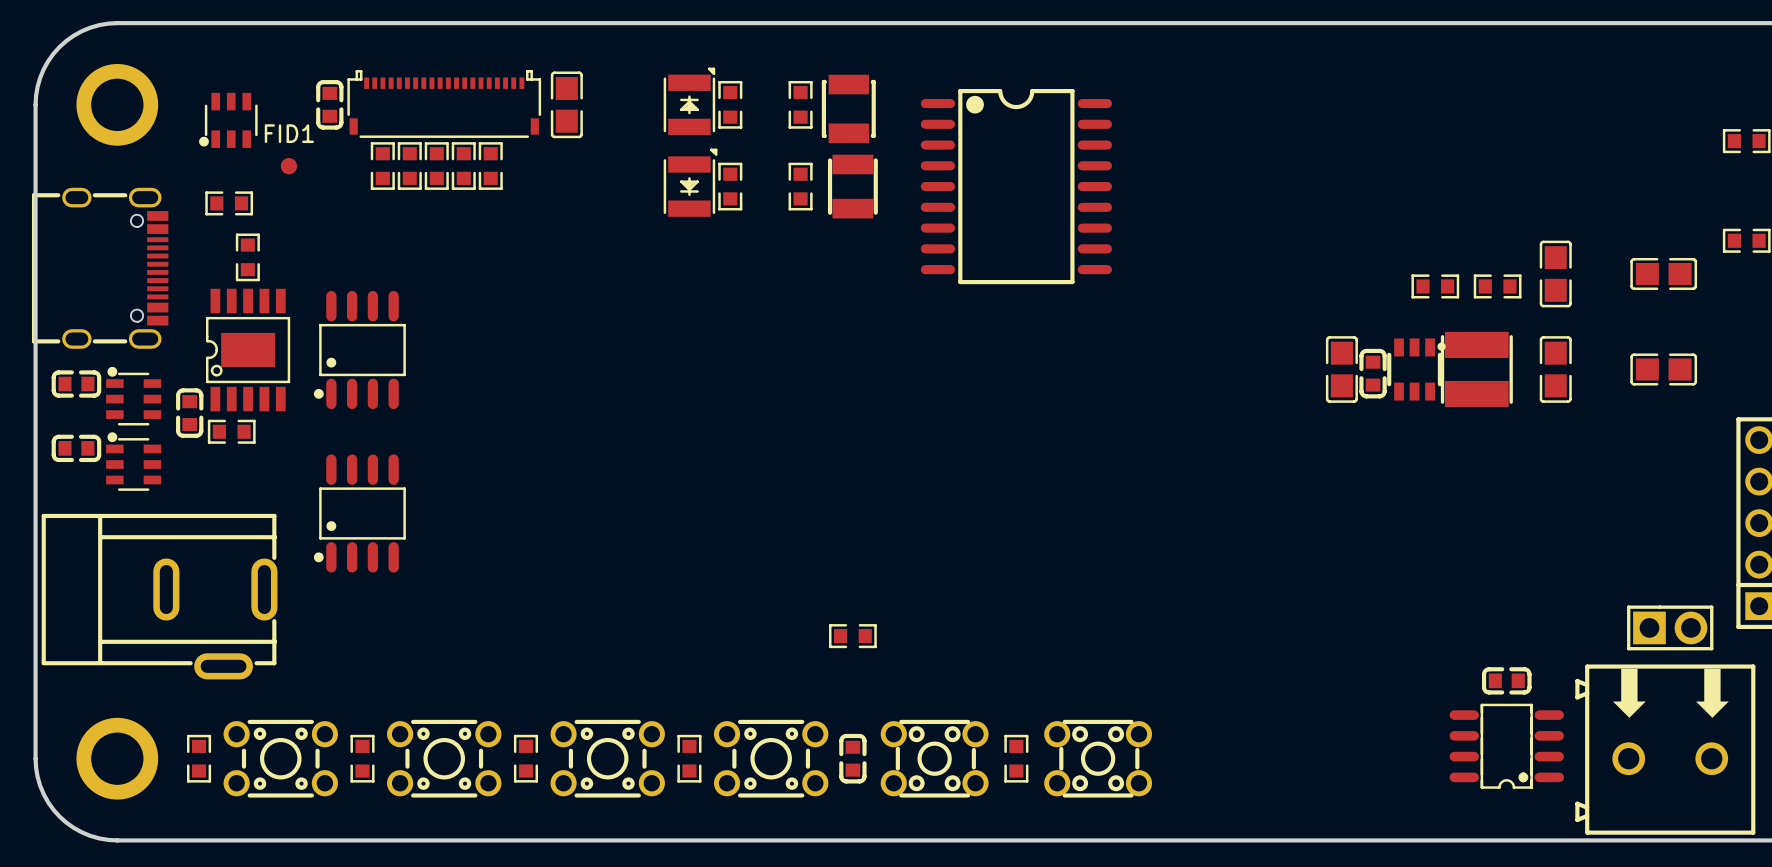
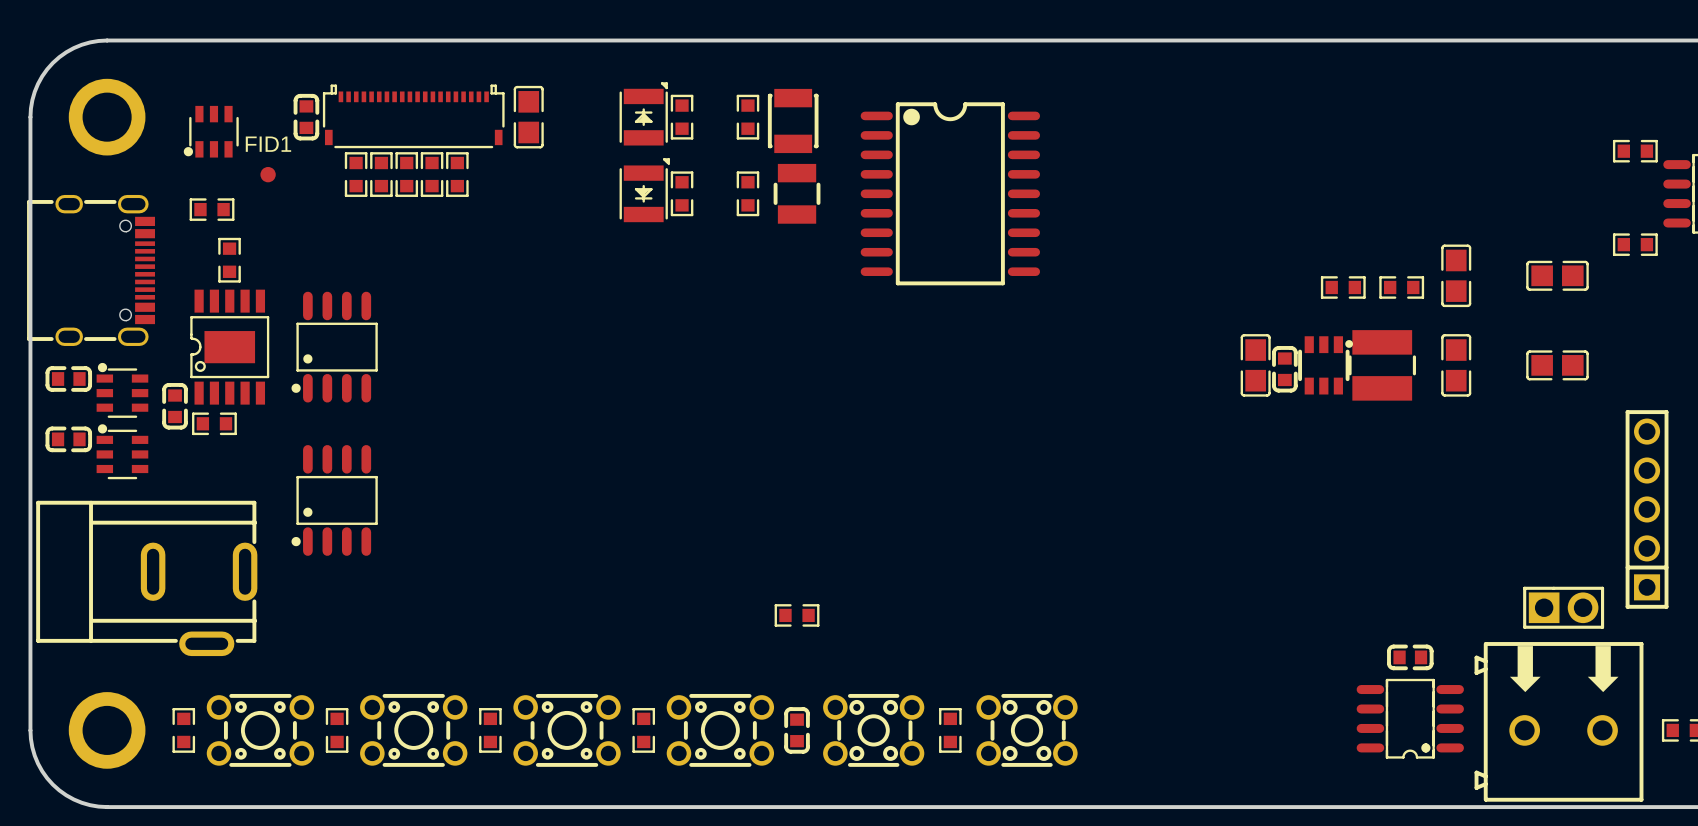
part footprint: [827, 154, 878, 219] -> [773, 163, 821, 224]
part footprint: [1440, 331, 1513, 408] -> [1348, 330, 1416, 401]
part footprint: [880, 719, 989, 798] -> [823, 693, 925, 767]
part footprint: [1044, 719, 1153, 798] -> [976, 693, 1078, 767]

